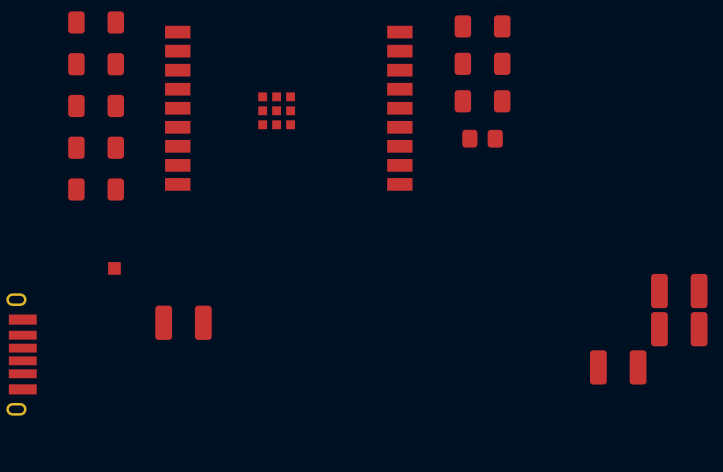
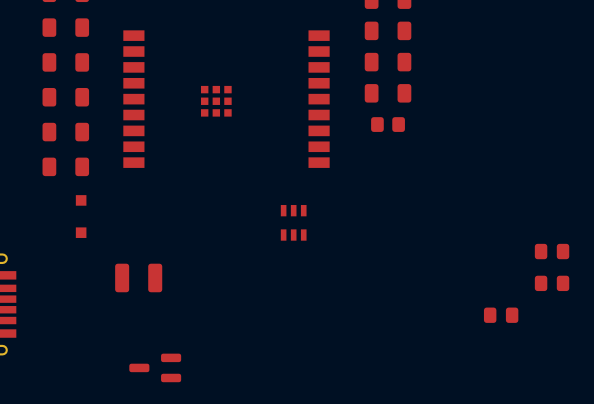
part: none -> (81, 200)
part: none -> (293, 222)
part footprint: [651, 273, 708, 309] -> [534, 243, 570, 260]
part footprint: [651, 312, 708, 347] -> [534, 275, 570, 292]
part footprint: [589, 350, 647, 385] -> [483, 307, 519, 323]
part: none -> (155, 367)

